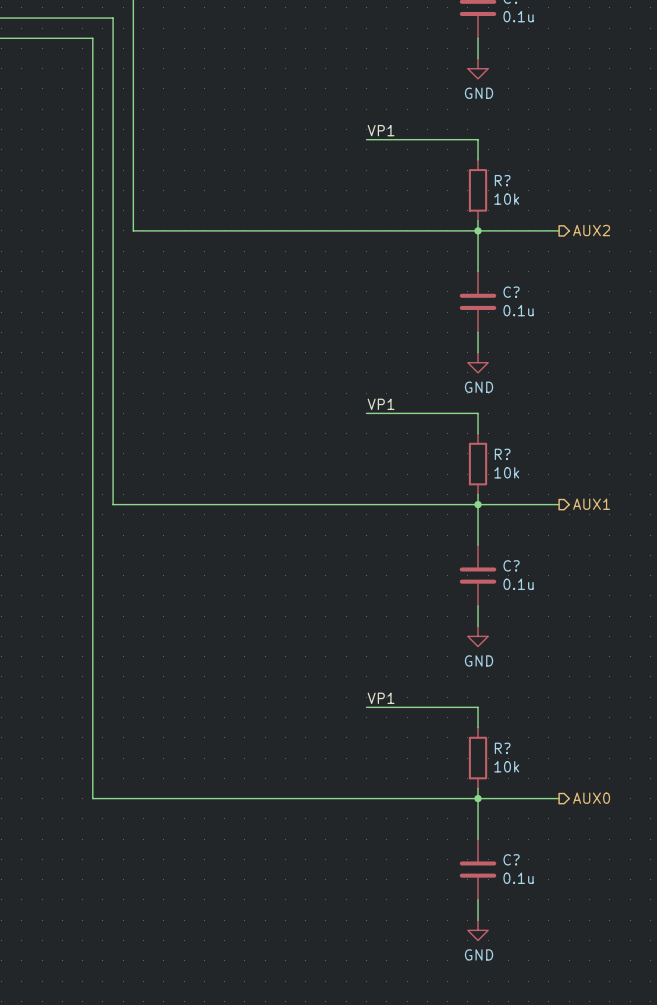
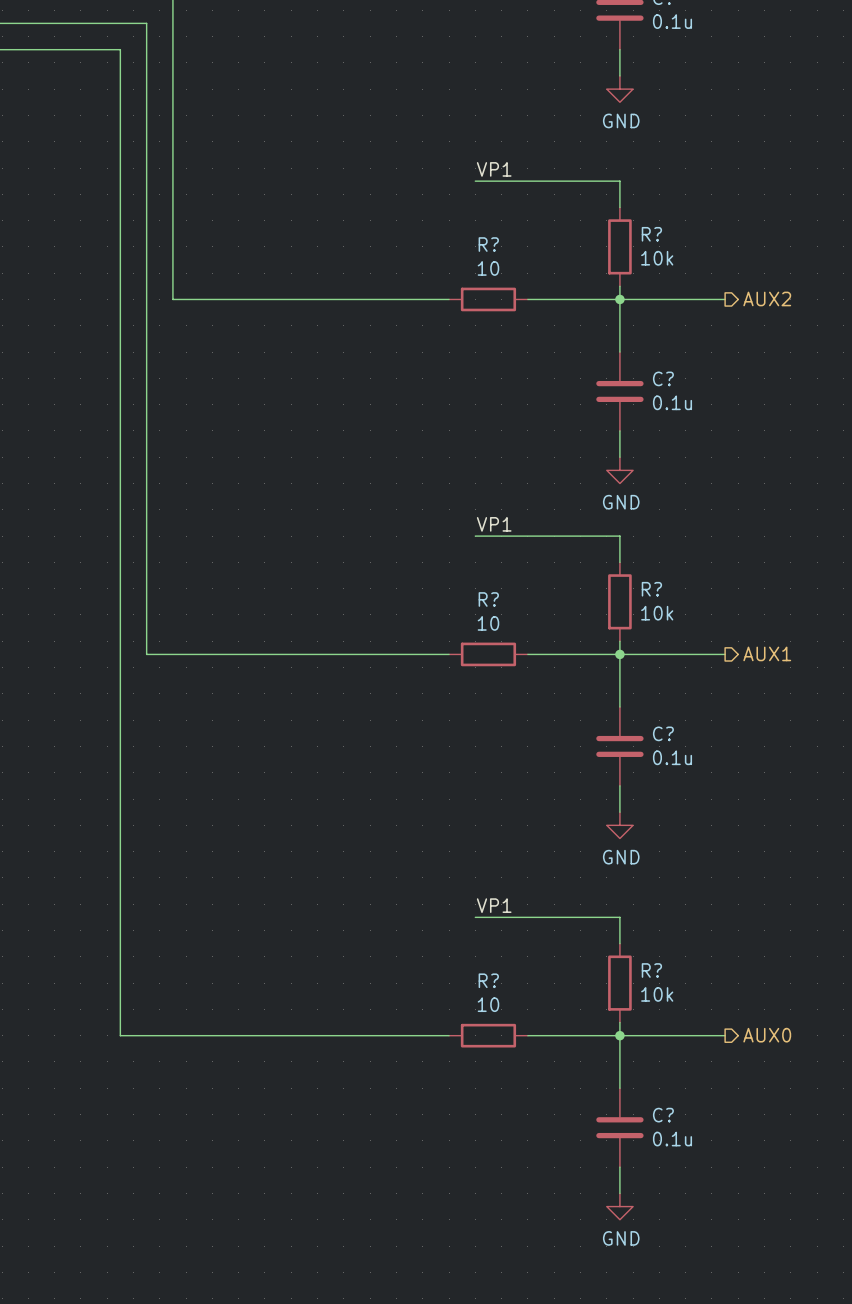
wire: (346, 230) (407, 230) -> none
R?: none -> 10 (488, 299)
wire: (346, 504) (407, 504) -> none
R?: none -> 10 (488, 654)
wire: (346, 798) (407, 798) -> none
R?: none -> 10 (488, 1035)

